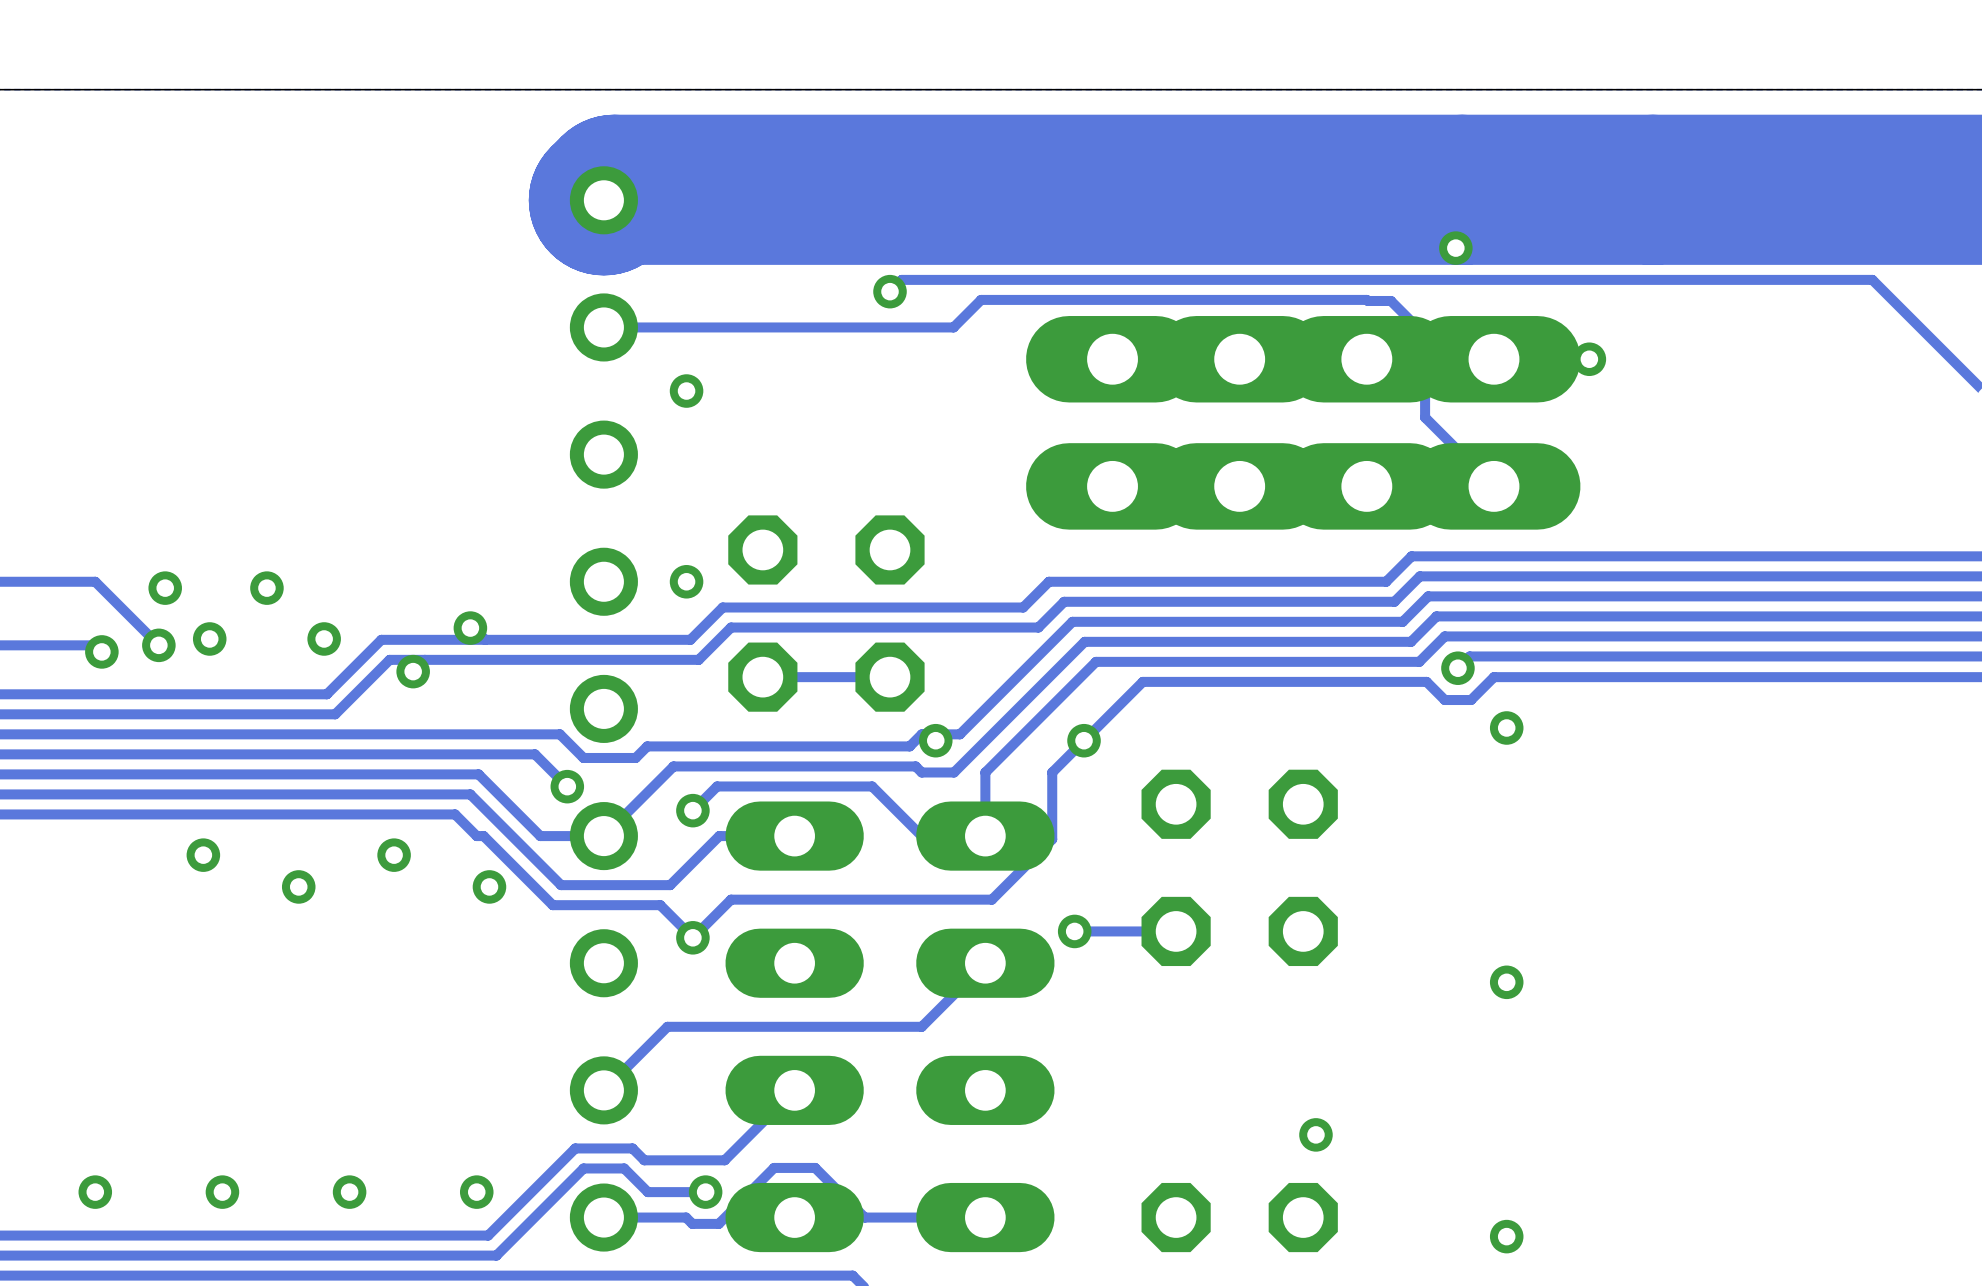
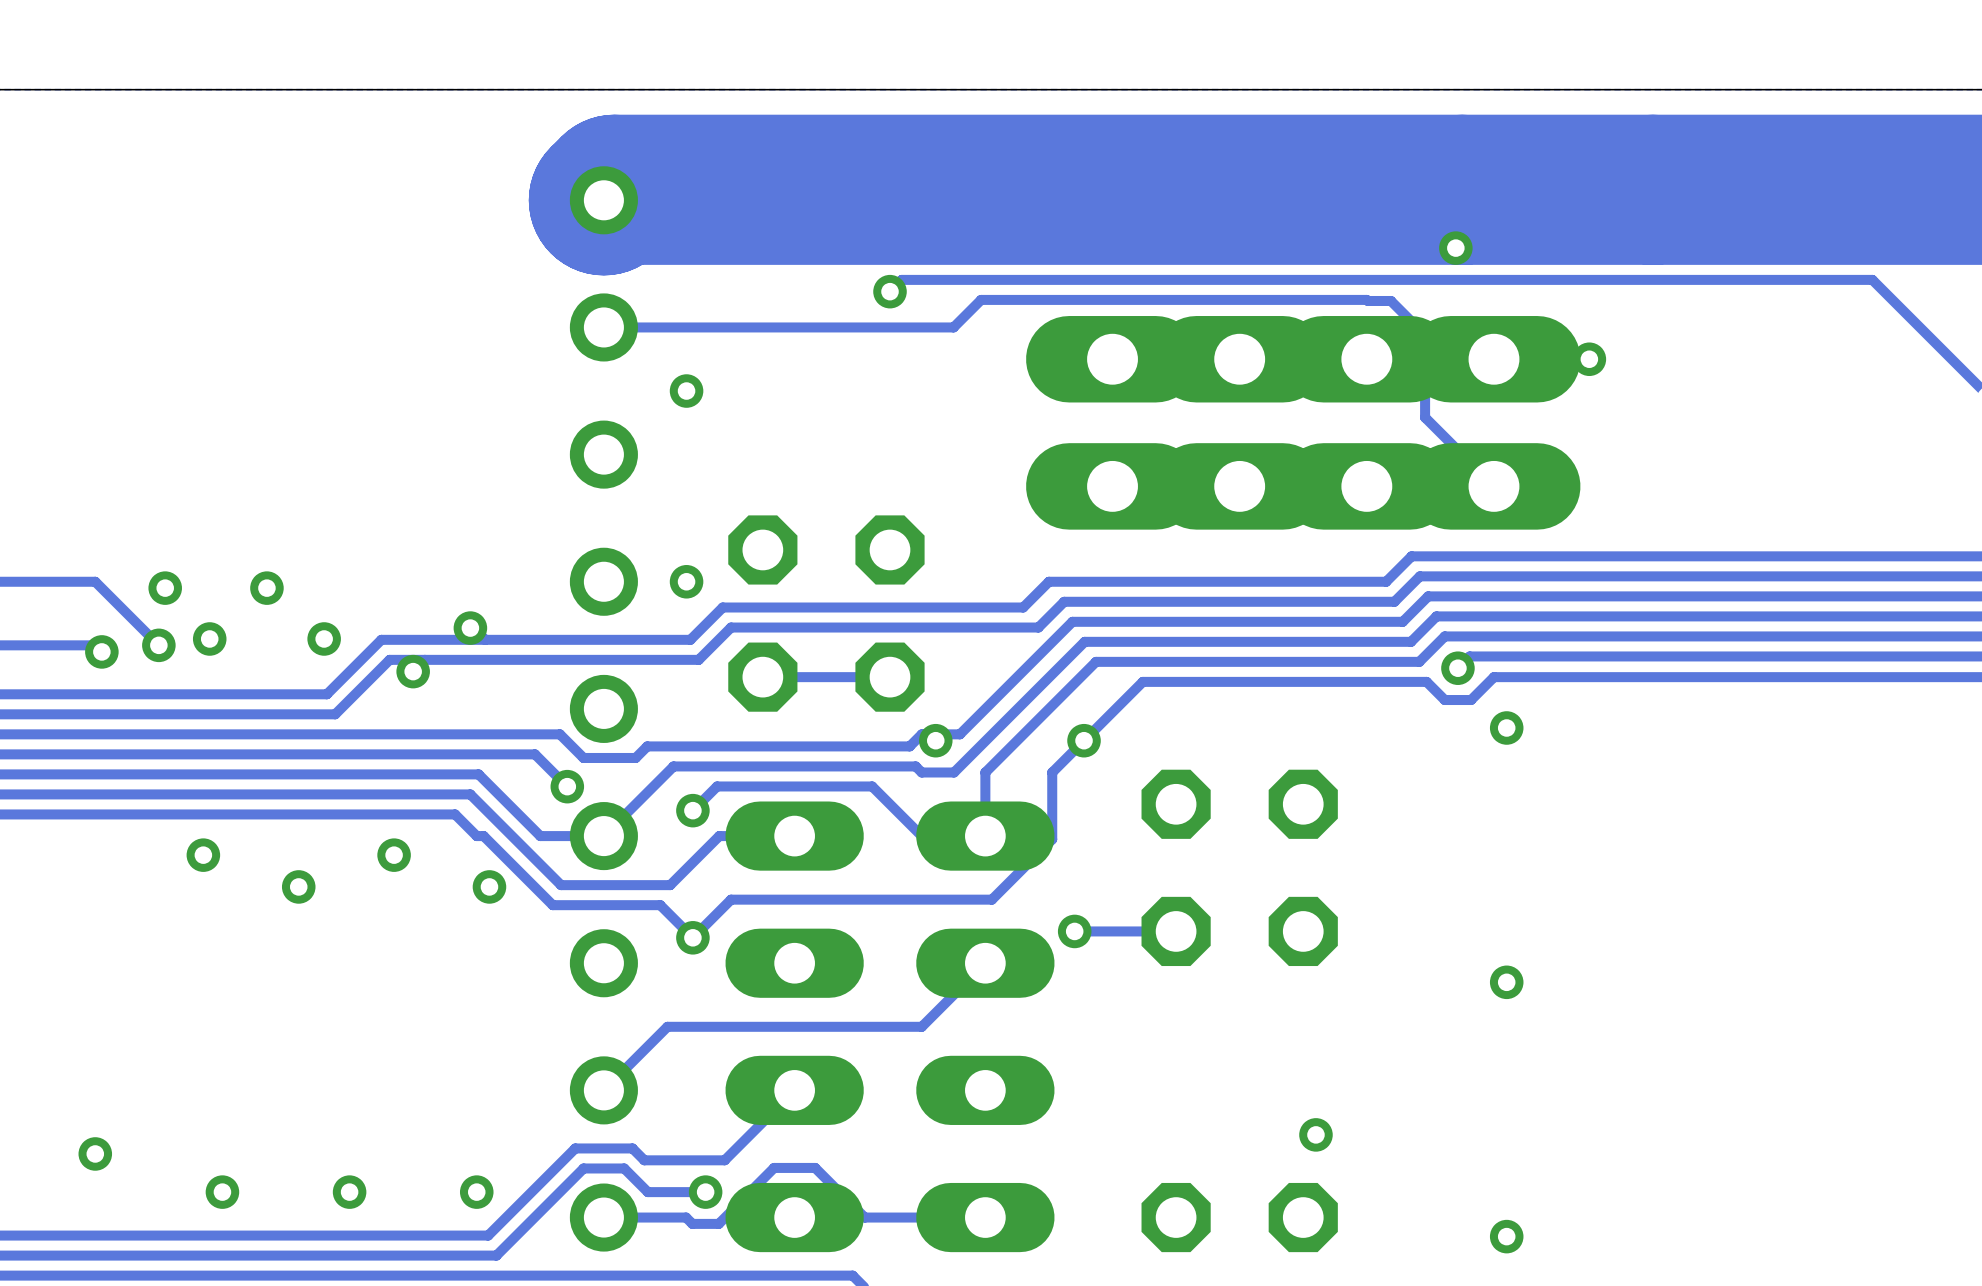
via position: (95, 1192) -> (95, 1153)

